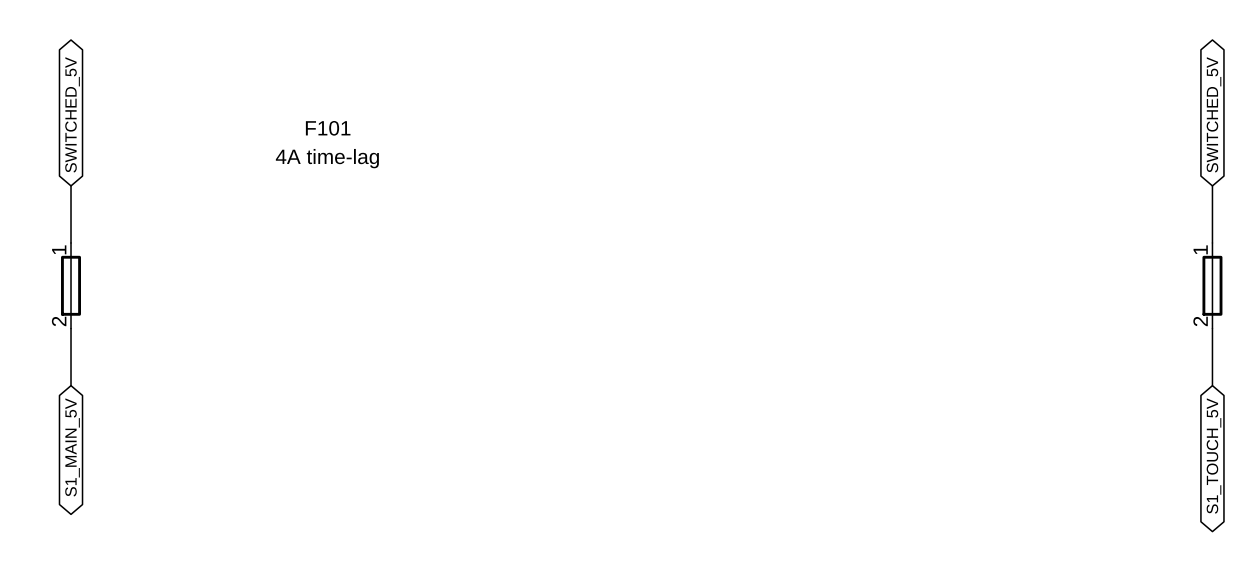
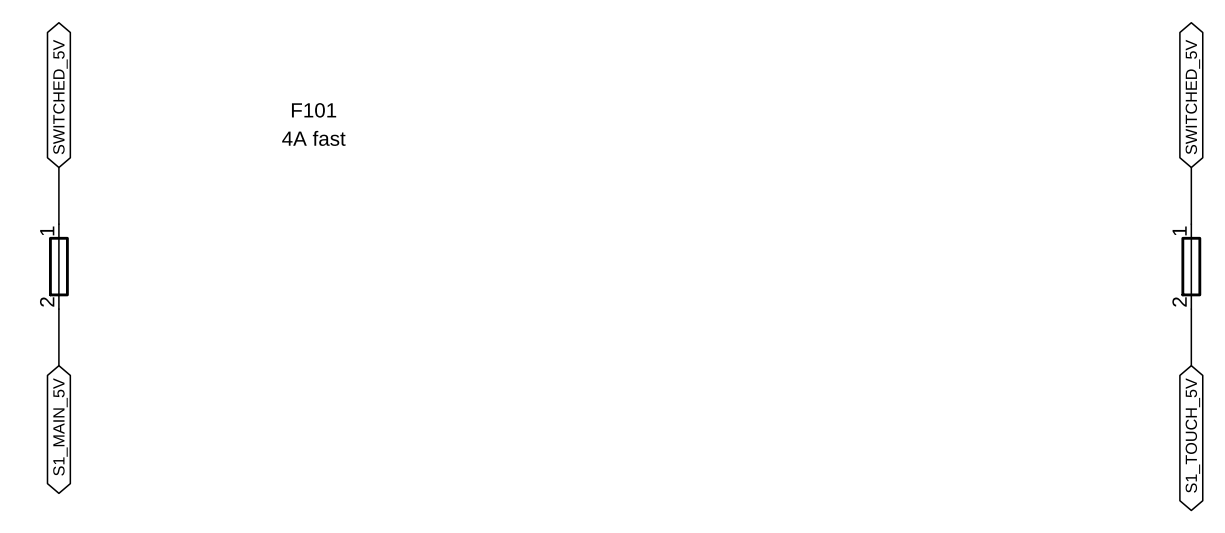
F101 value: 4A time-lag (327, 158) -> 4A fast (313, 138)

